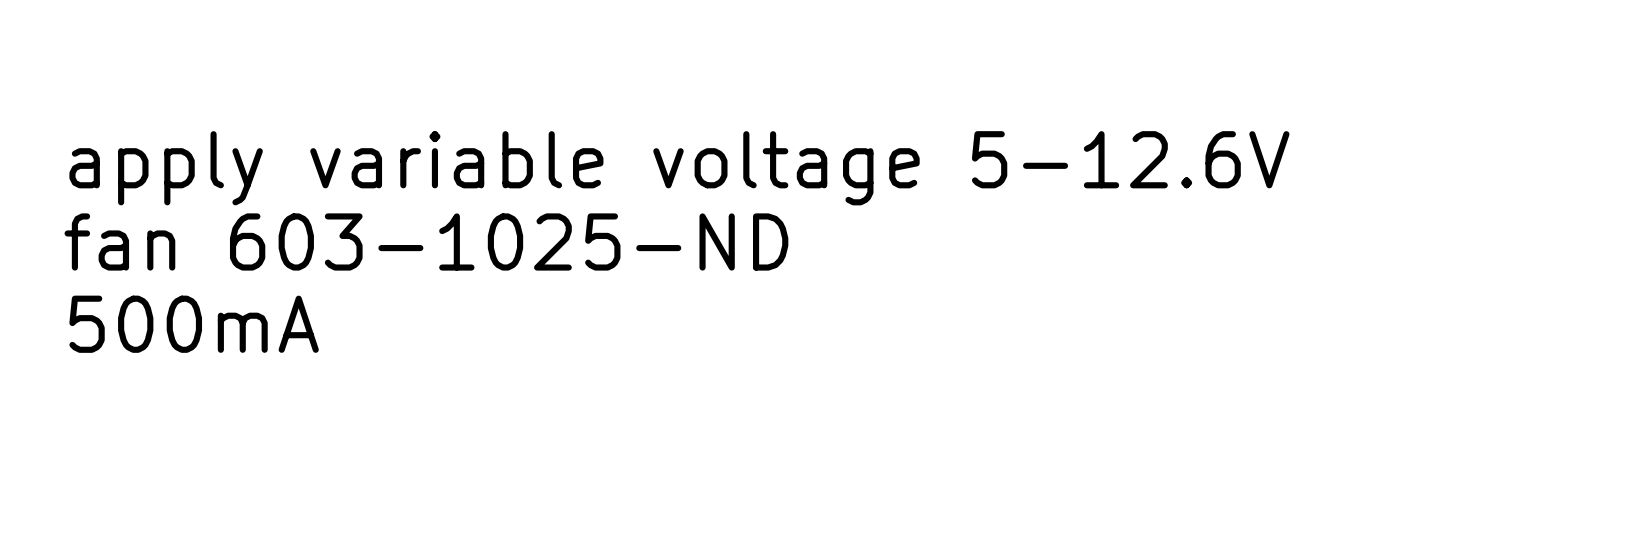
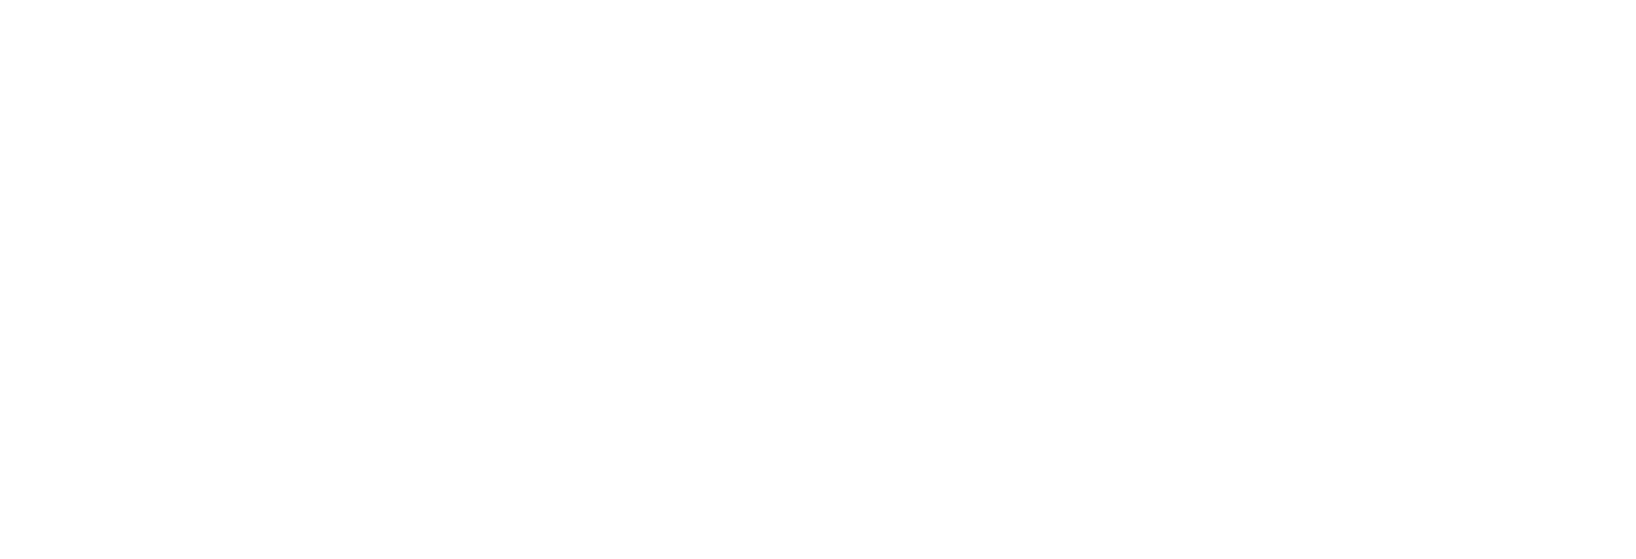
text: apply variable voltage 5-12.6V (679, 168) -> none
text: fan 603-1025-ND (426, 241) -> none
text: 500mA (194, 324) -> none

